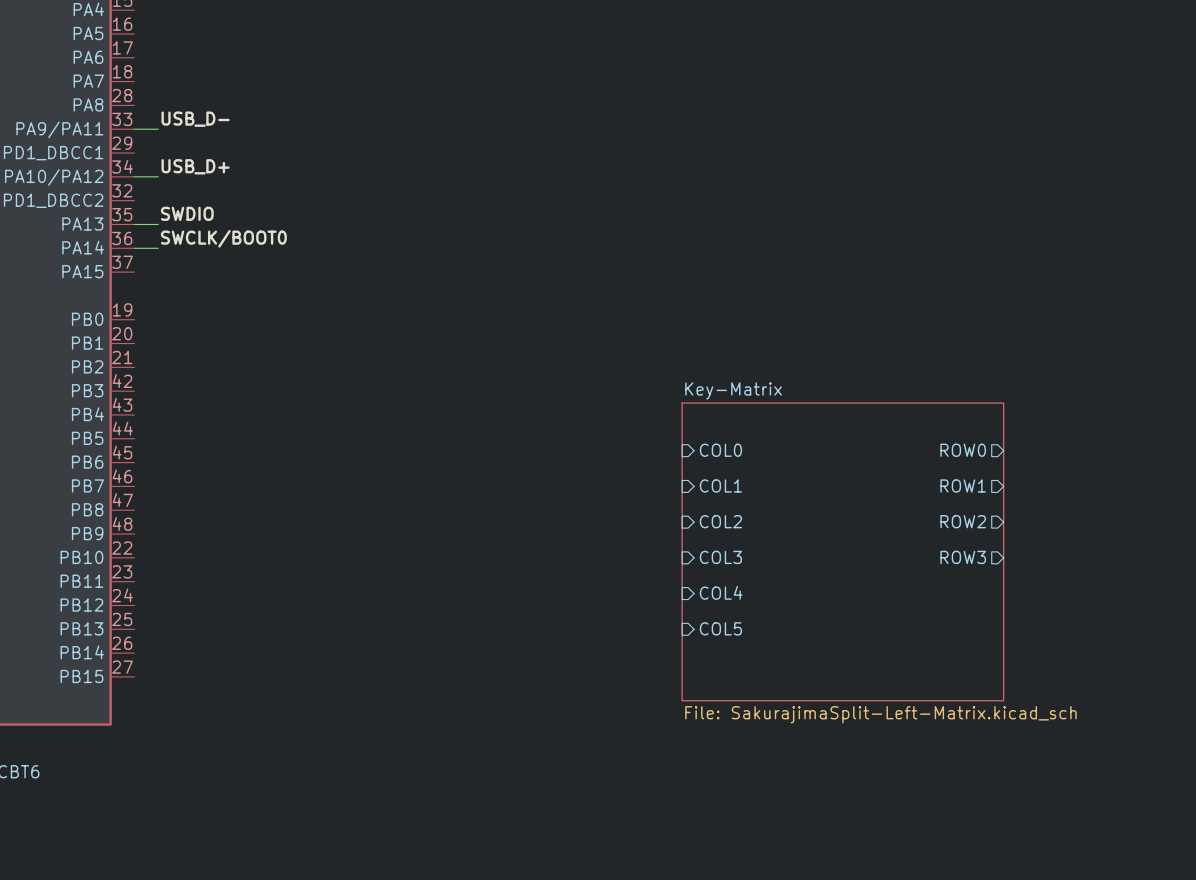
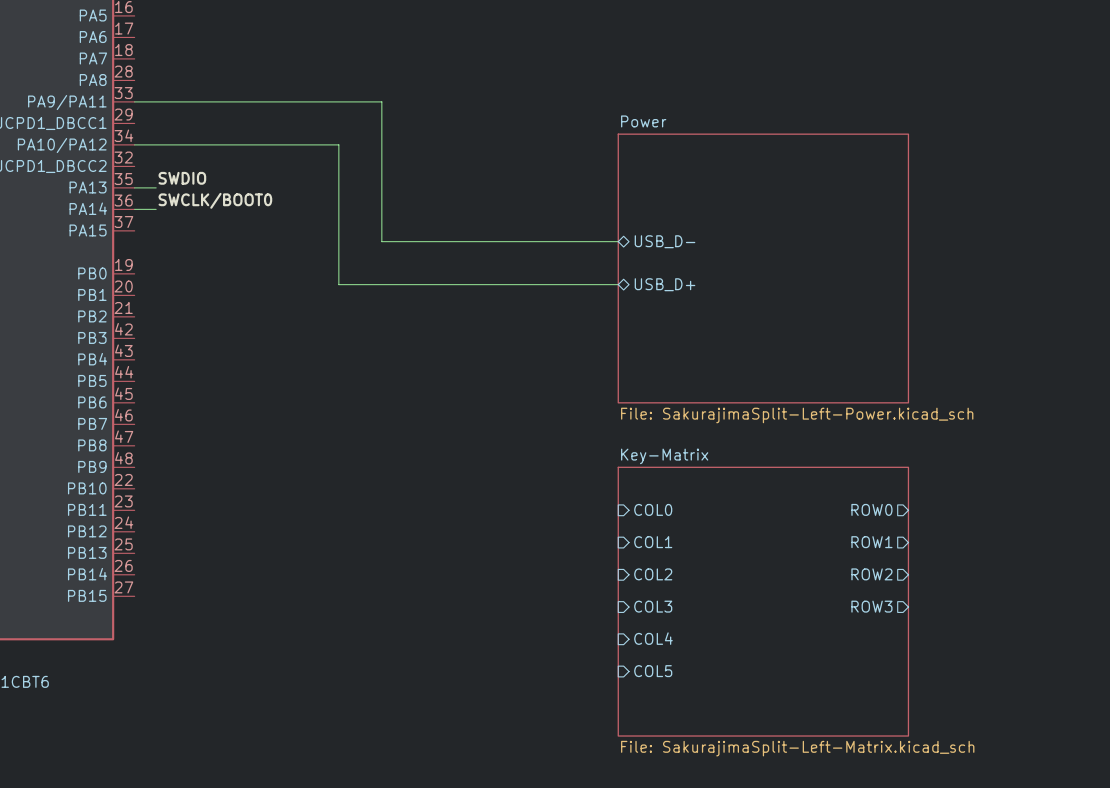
label: USB_D- (195, 119) -> none
wire: none -> (156, 101) (381, 101) (381, 241) (618, 241)
label: USB_D+ (195, 166) -> none
wire: none -> (156, 144) (338, 144) (338, 284) (618, 284)
sheet pin: none -> USB_D- (665, 241)
sheet Power: none -> File: SakurajimaSplit-Left-Power.kicad_sch (763, 268)
sheet pin: none -> USB_D+ (665, 284)
sheet pin position: COL0 (720, 450) -> COL0 (653, 509)
sheet pin position: ROW0 (963, 450) -> ROW0 (871, 509)
sheet pin position: COL1 (720, 485) -> COL1 (653, 542)
sheet pin position: ROW1 (963, 485) -> ROW1 (871, 542)
sheet pin position: COL2 (720, 521) -> COL2 (653, 574)
sheet pin position: ROW2 (963, 521) -> ROW2 (871, 574)
sheet Key-Matrix position: (842, 551) -> (763, 601)
sheet pin position: COL3 (720, 557) -> COL3 (653, 606)
sheet pin position: ROW3 (963, 557) -> ROW3 (871, 606)
sheet pin position: COL4 (721, 592) -> COL4 (653, 638)
sheet pin position: COL5 (720, 628) -> COL5 (653, 671)

